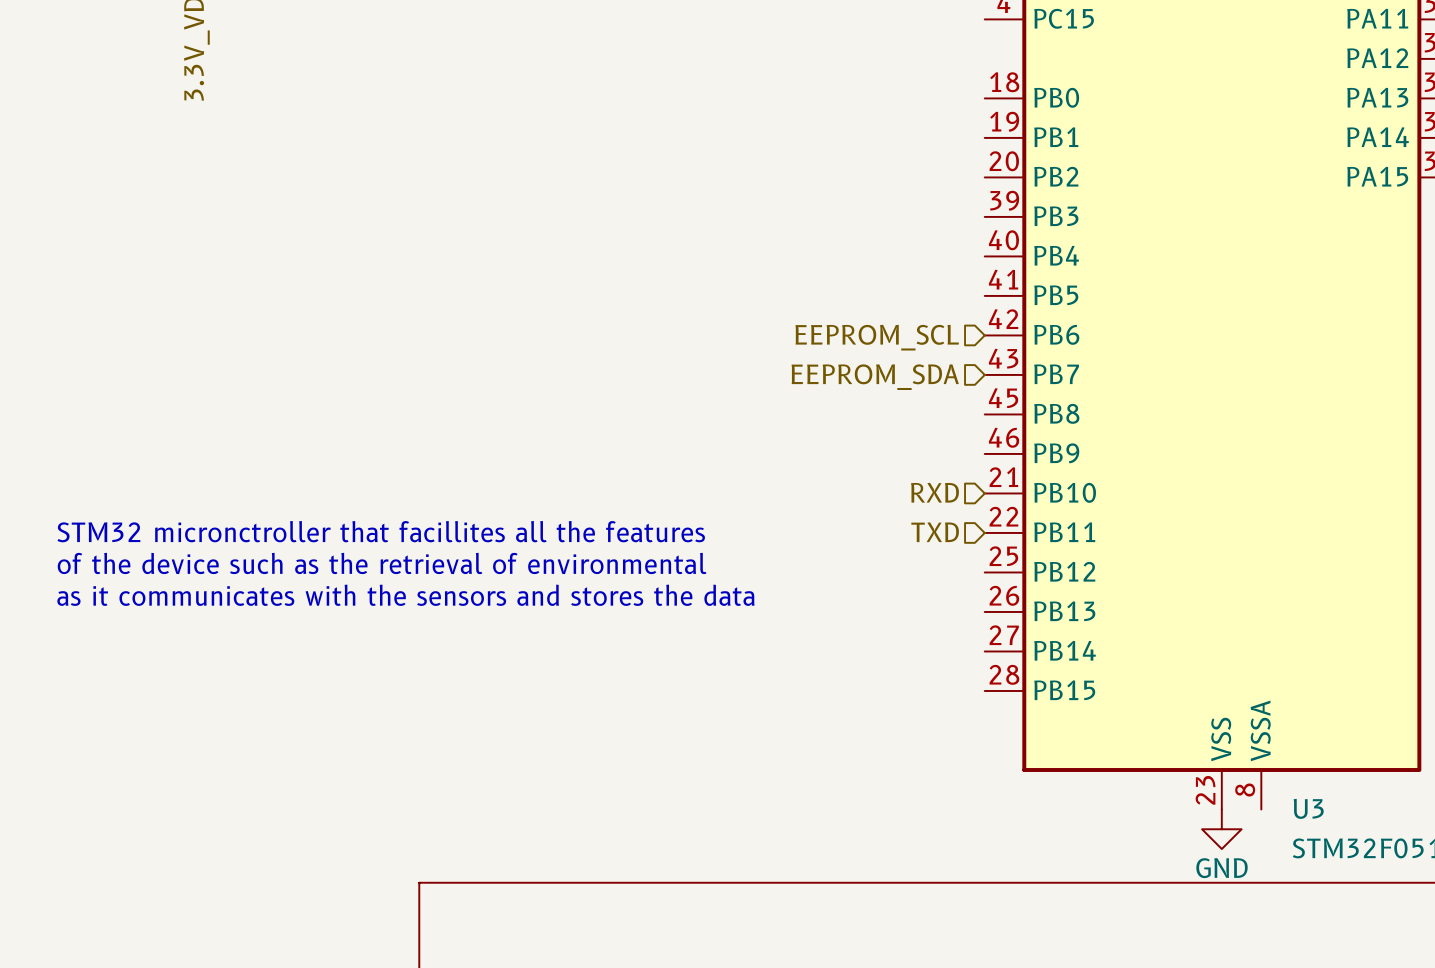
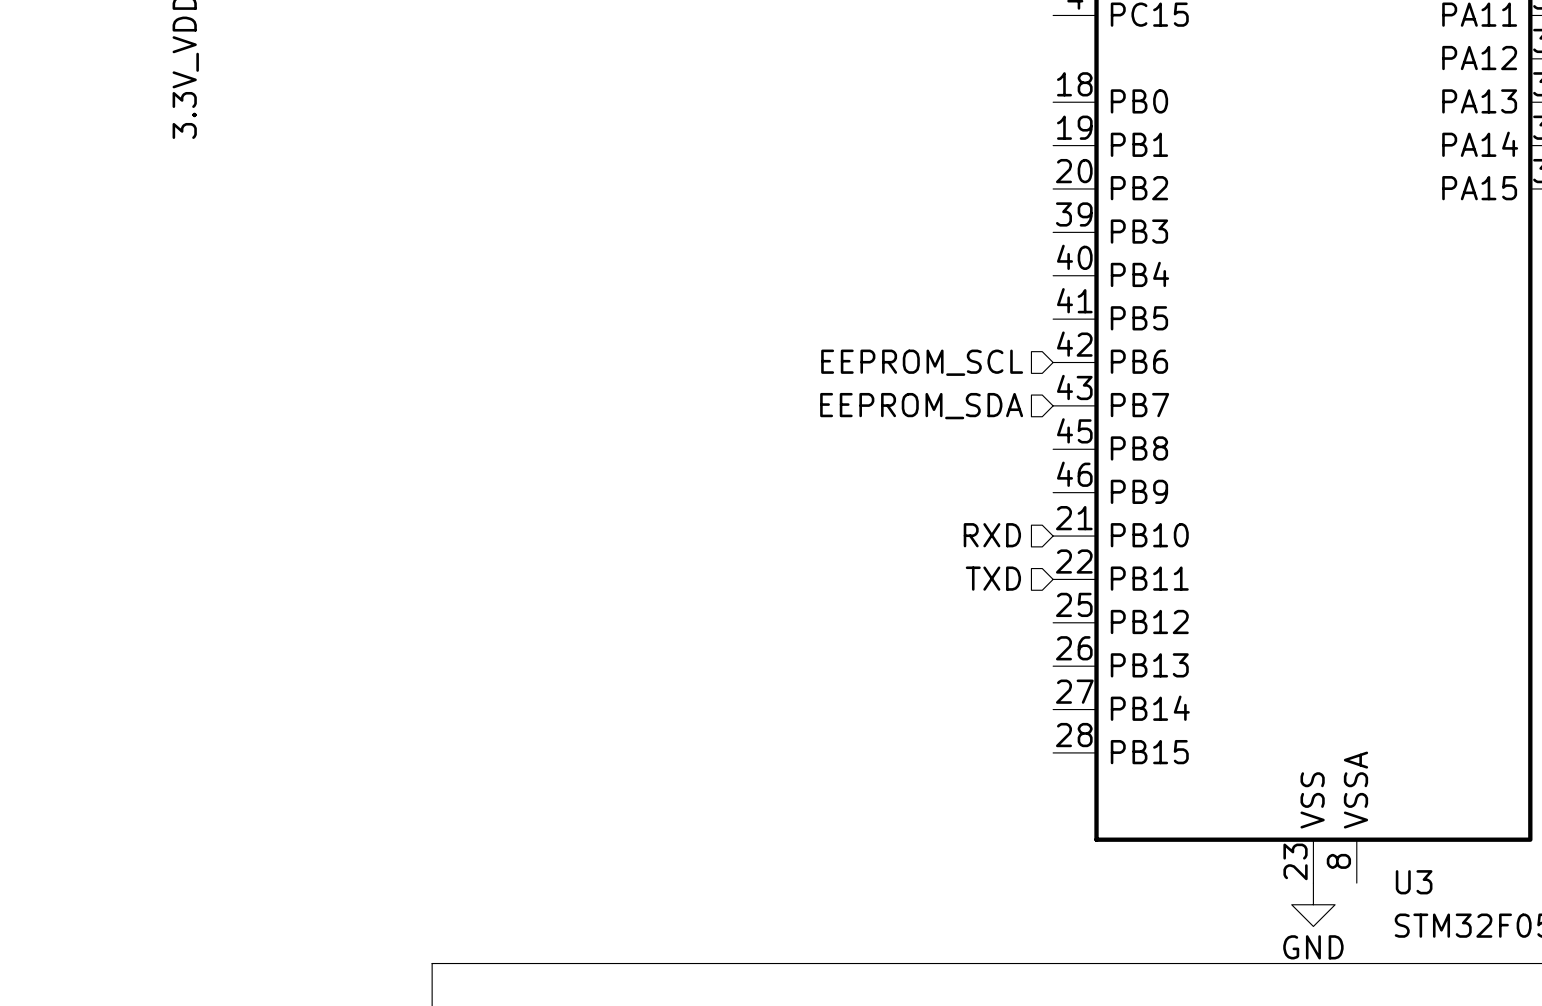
text: STM32 micronctroller that facillites all the features (381, 531) -> none
text: of the device such as the retrieval of environmental (382, 563) -> none
text: as it communicates with the sensors and stores the data (405, 595) -> none

